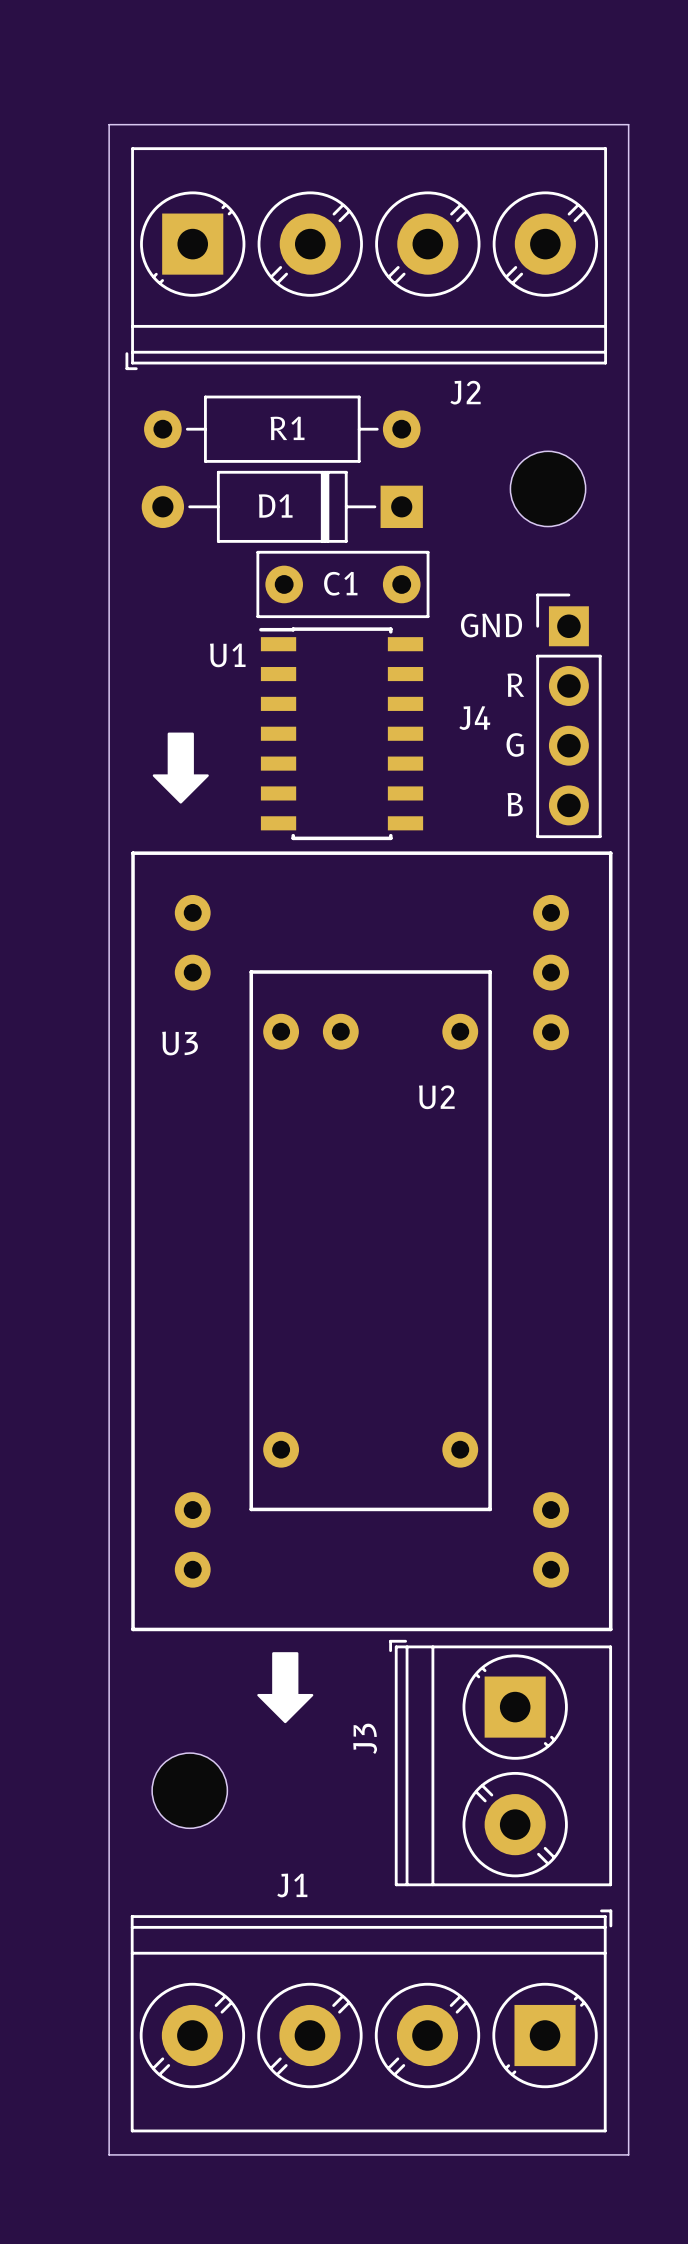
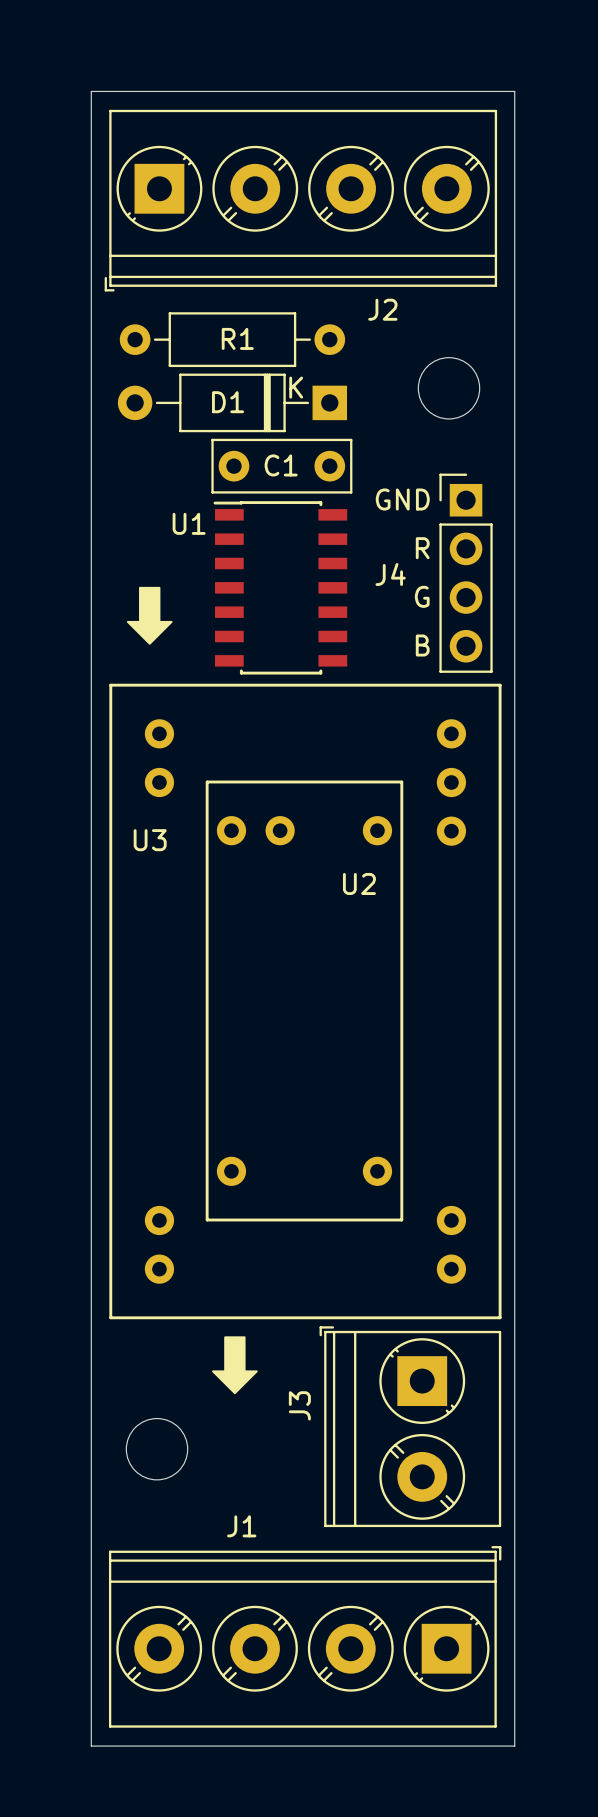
D1 text: none -> K (296, 387)

